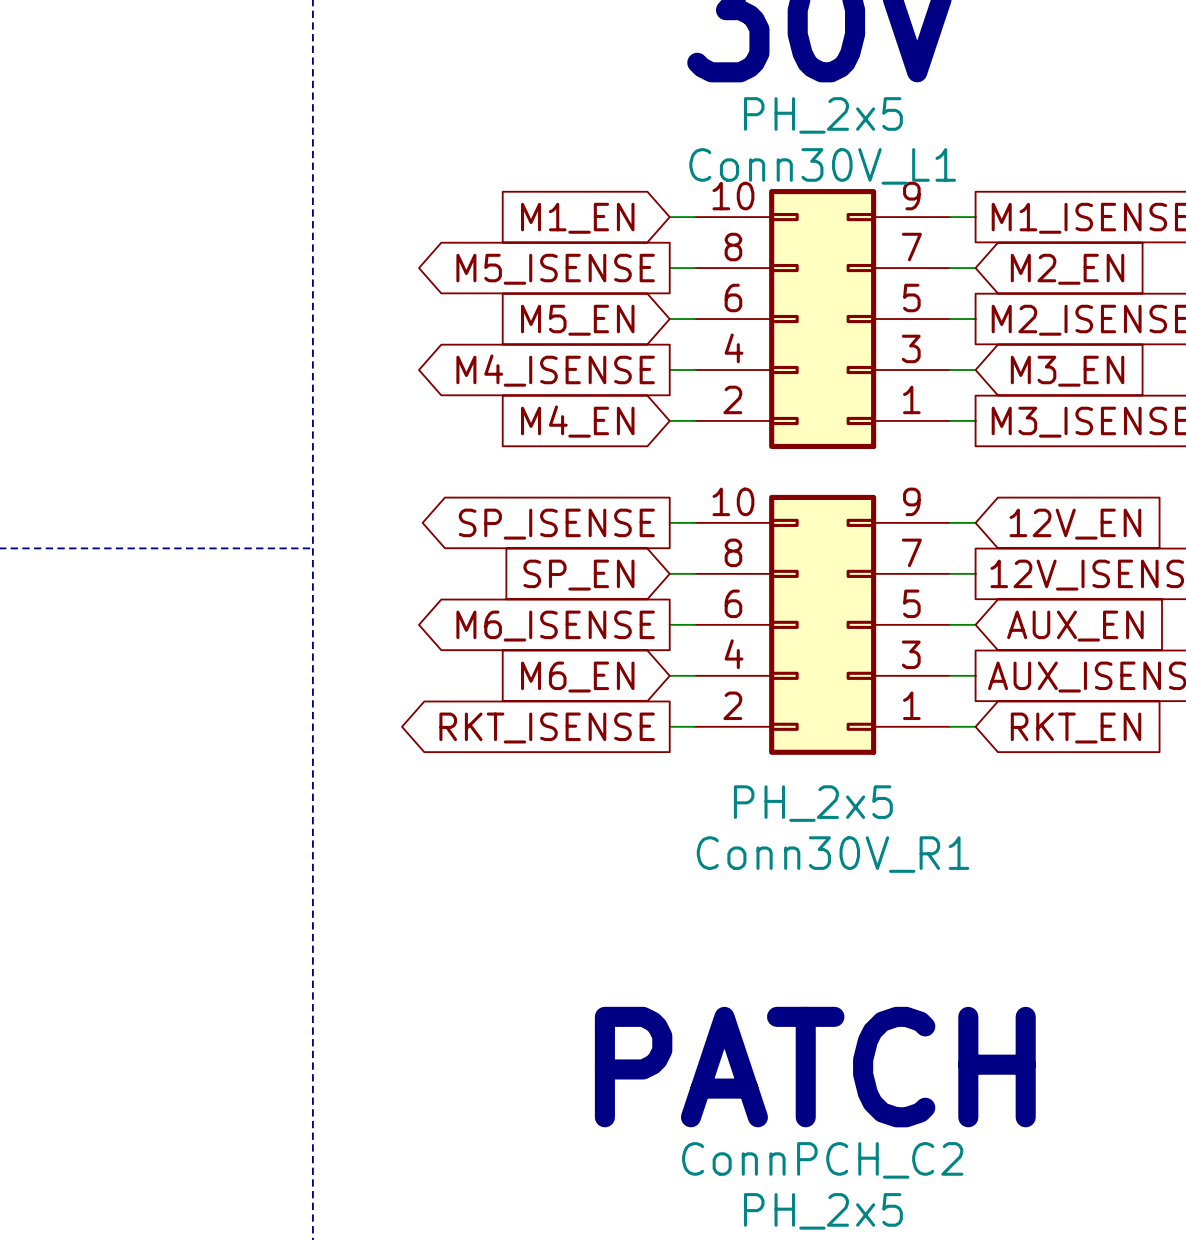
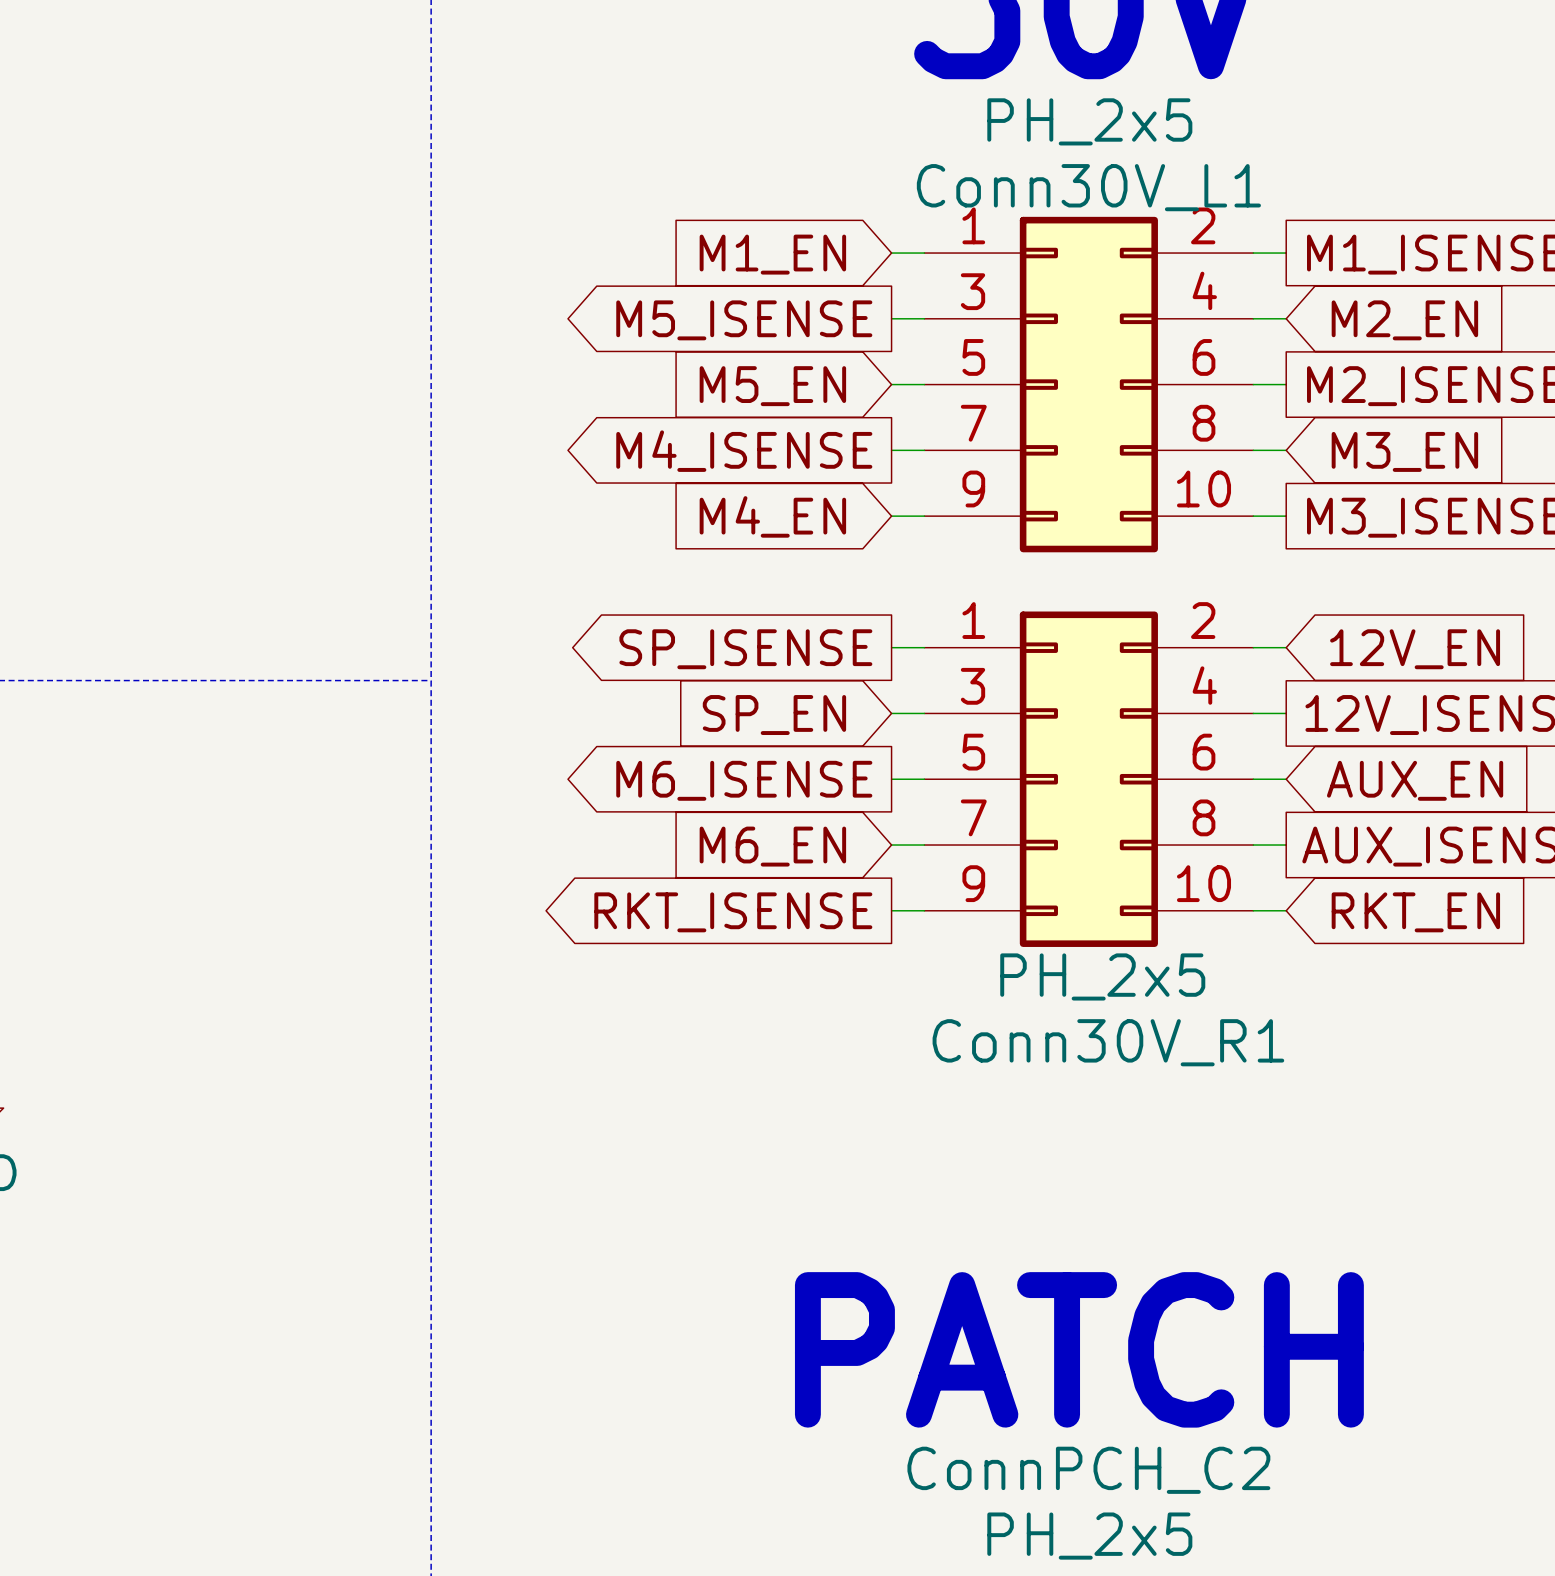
Conn30V_L1 rotation: 0° (822, 319) -> 180° (1088, 384)
Conn30V_R1 rotation: 0° (822, 624) -> 180° (1088, 779)
Conn30V_R1 value position: PH_2x5 (813, 803) -> PH_2x5 (1102, 976)
Conn30V_R1 name position: Conn30V_R1 (833, 854) -> Conn30V_R1 (1108, 1042)

